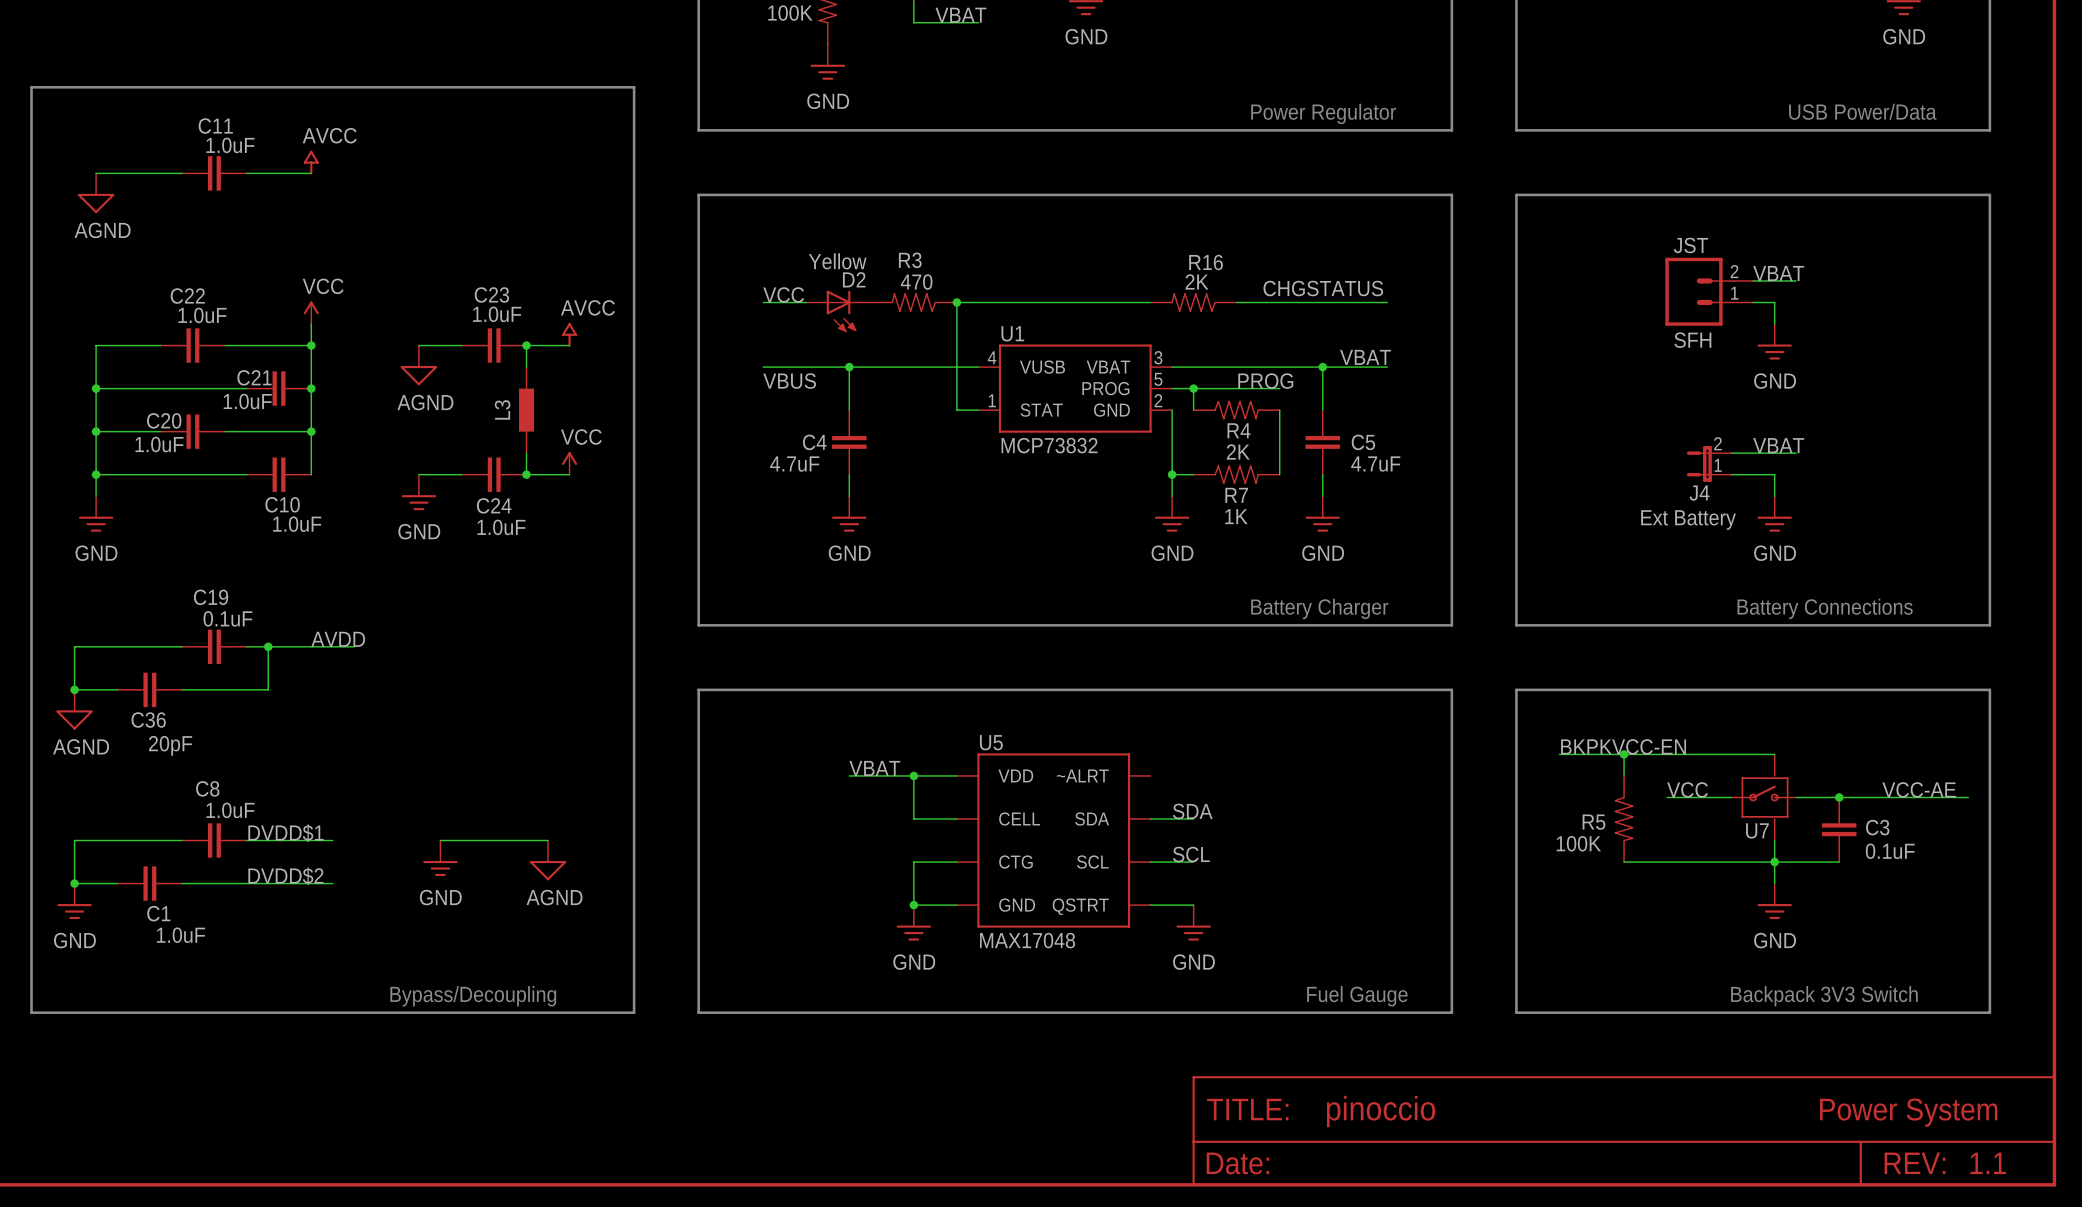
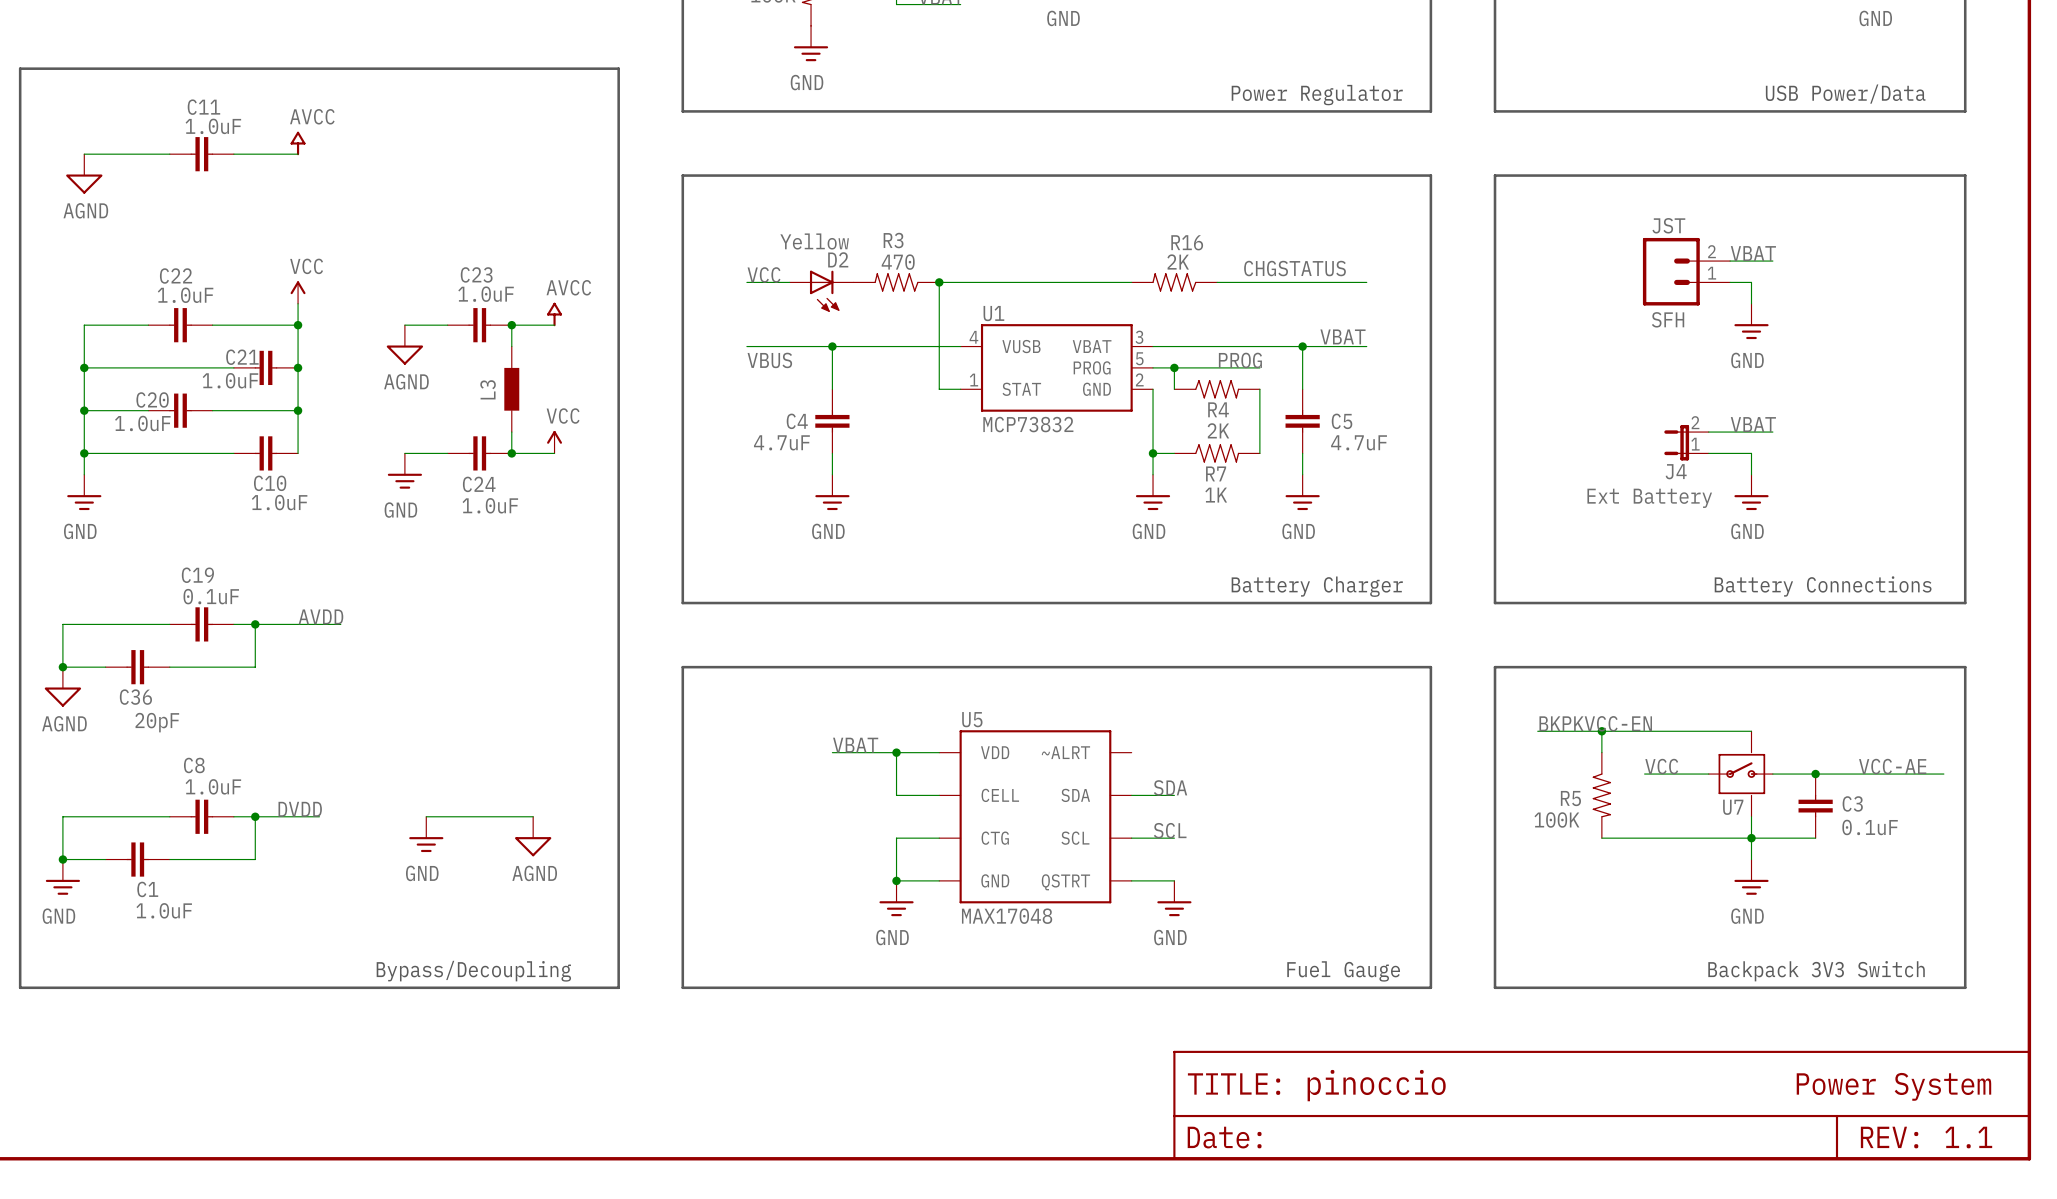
label: DVDD$1 (285, 833) -> DVDD (300, 809)
junction: none -> (255, 816)
label: DVDD$2 (285, 876) -> none
wire: (268, 883) (332, 883) -> (255, 859) (255, 816)

